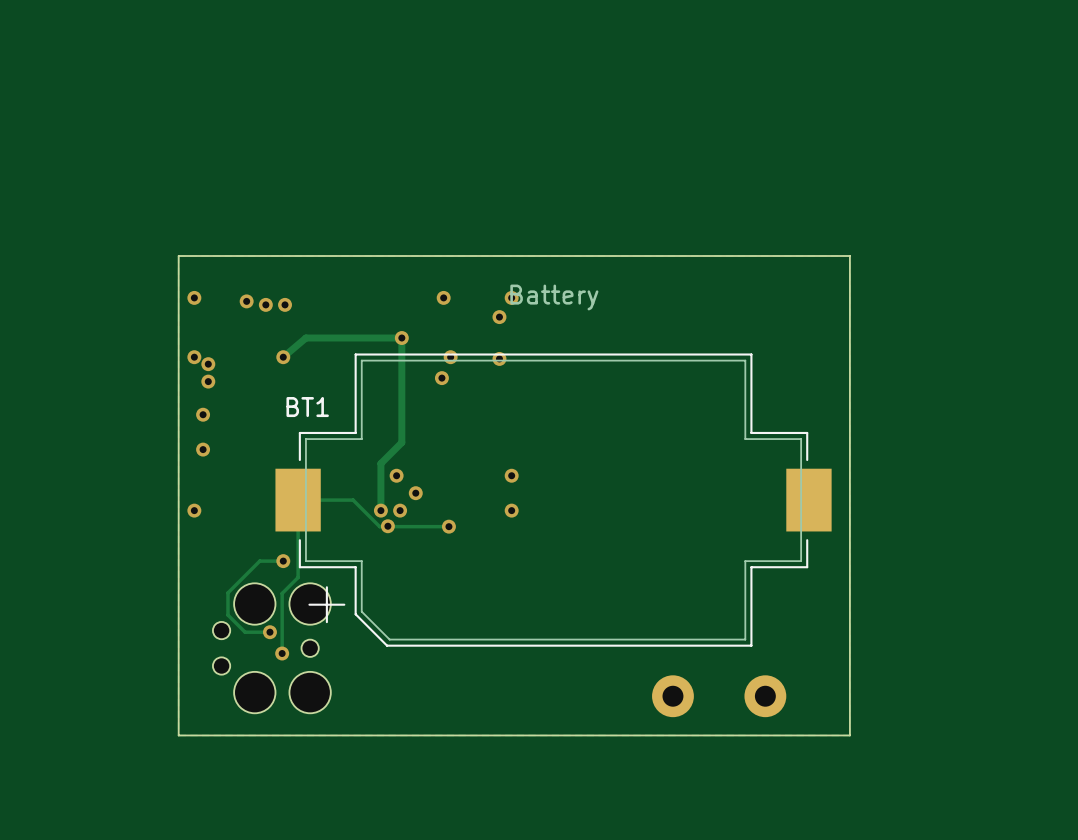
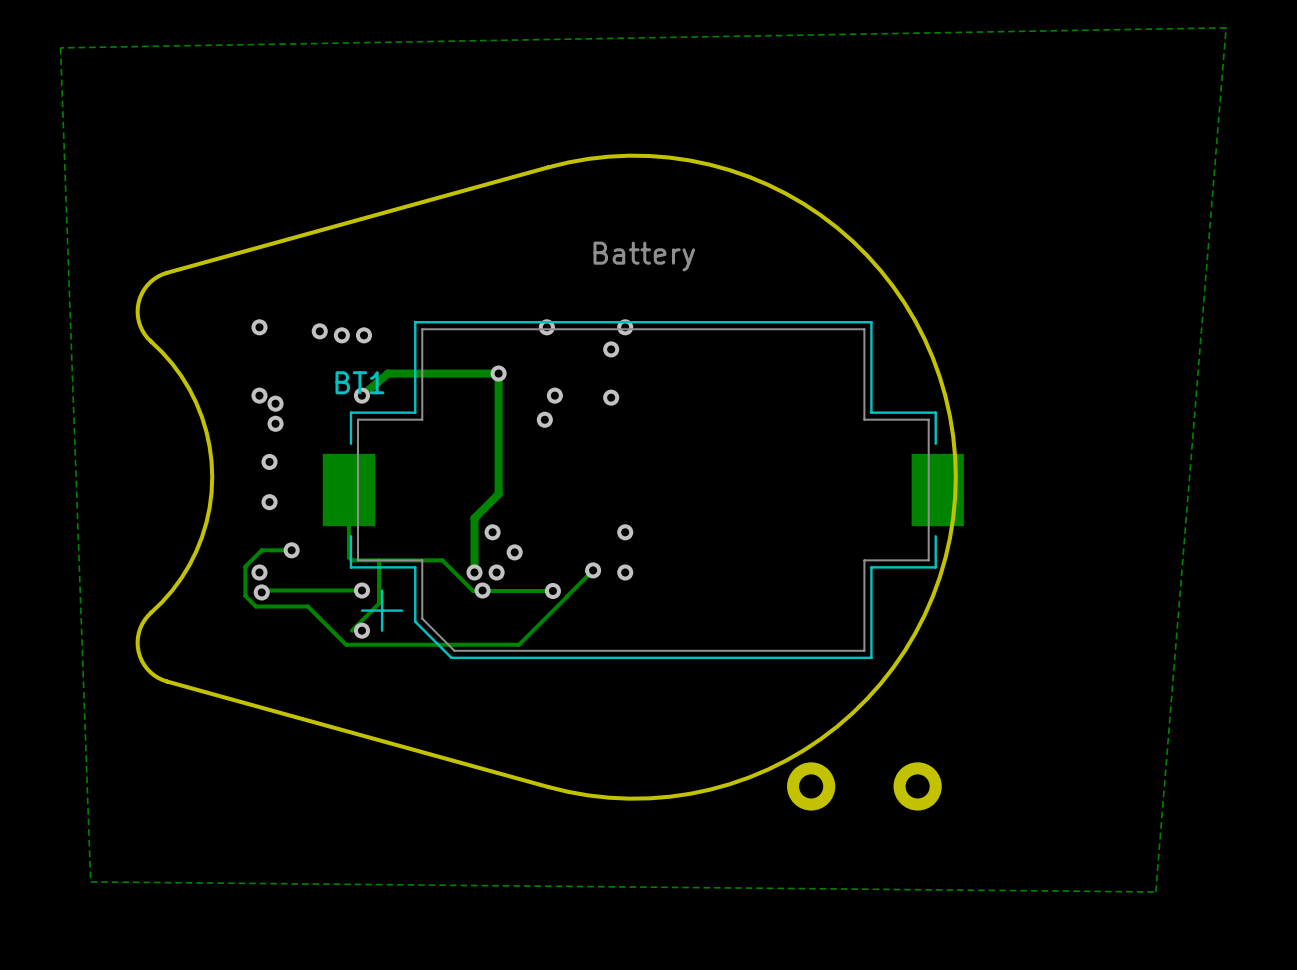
zone outline: none -> (1226, 27) (1155, 891) (90, 881) (60, 47) (1226, 27)
board edge: (849, 256) (178, 256) (178, 735) (849, 735) (849, 256) -> (548, 167) (608, 156) (649, 156) (690, 160) (748, 176) (786, 193) (836, 227) (880, 270) (904, 303) (924, 338) (945, 396) (955, 456) (955, 497) (949, 538) (939, 577) (915, 633) (893, 667) (866, 699) (836, 726) (803, 750) (767, 769) (729, 784) (690, 793) (629, 798) (588, 795) (548, 787) (167, 681) (154, 675) (147, 668) (139, 656) (137, 647) (138, 632) (144, 619) (181, 578) (196, 551) (209, 507) (212, 477) (209, 446) (196, 402) (181, 376) (147, 338) (140, 326) (137, 307) (141, 293) (147, 285) (154, 279) (167, 272) (548, 167)
track: none -> (348, 490) (348, 557) (351, 560) (379, 560)
track: none -> (291, 550) (261, 550) (245, 566) (245, 596) (255, 606) (307, 606) (346, 644) (519, 644) (566, 596)
via: none -> (291, 550)
BT1 position: (553, 500) -> (643, 490)
track: none -> (593, 570) (566, 596)
via: none -> (593, 570)
track: none -> (361, 590) (261, 590) (261, 592)
via: none -> (361, 590)
via: none -> (261, 592)
track: (298, 537) (298, 577) (282, 593) (282, 653) -> (379, 603) (351, 630)
track: (283, 561) (259, 561) (227, 592) (227, 615) (245, 632) (269, 632) -> none
via: (269, 632) -> none
part: (271, 648) -> none
via: (282, 653) -> none

